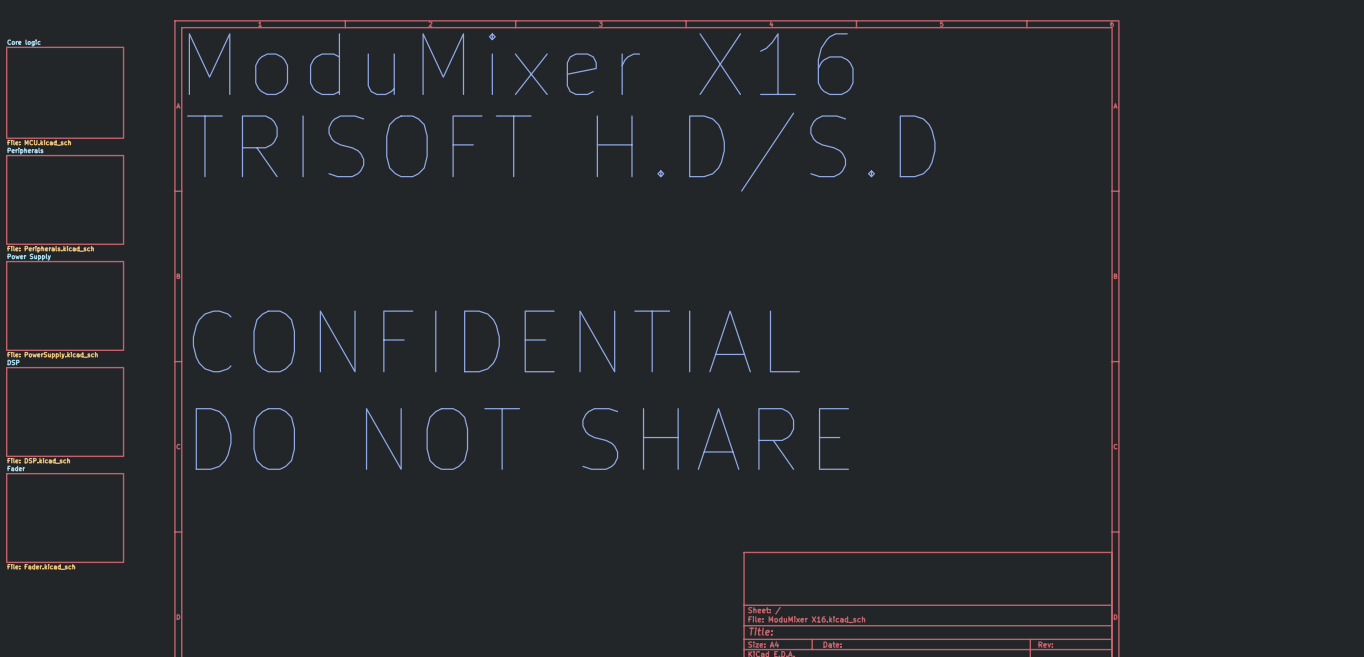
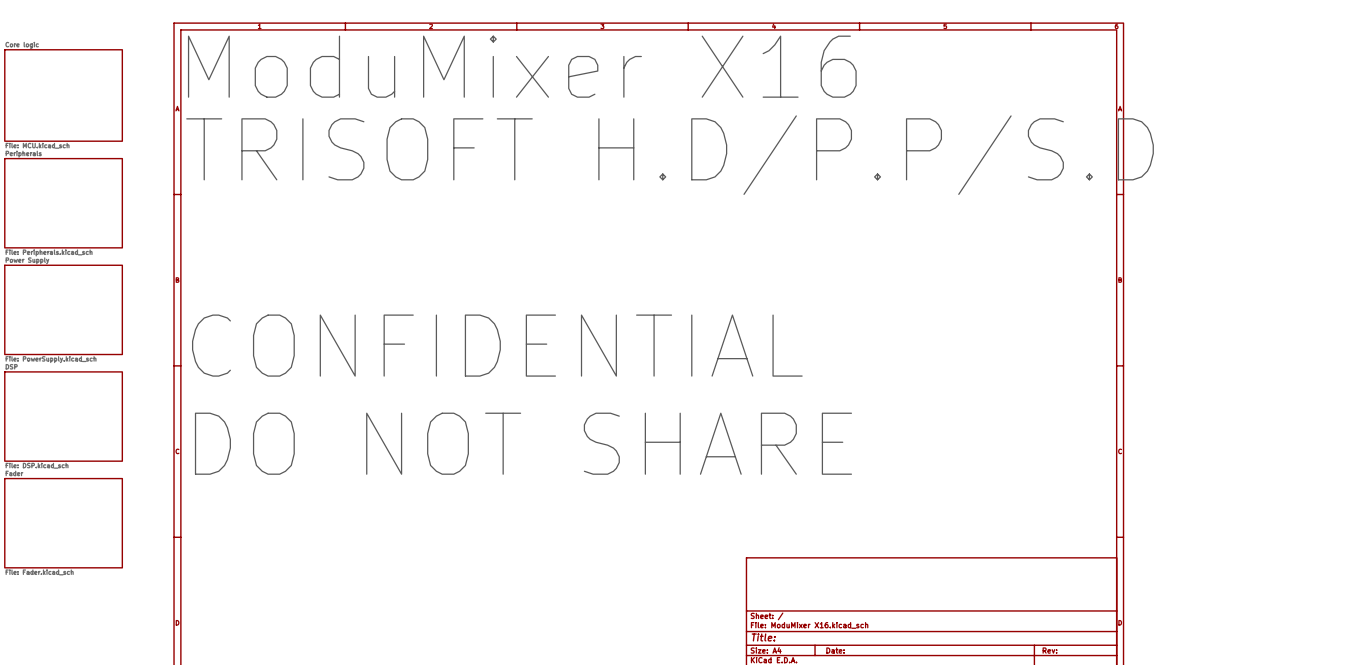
text: TRISOFT H.D/S.D (561, 152) -> TRISOFT H.D/P.P/S.D (670, 155)

